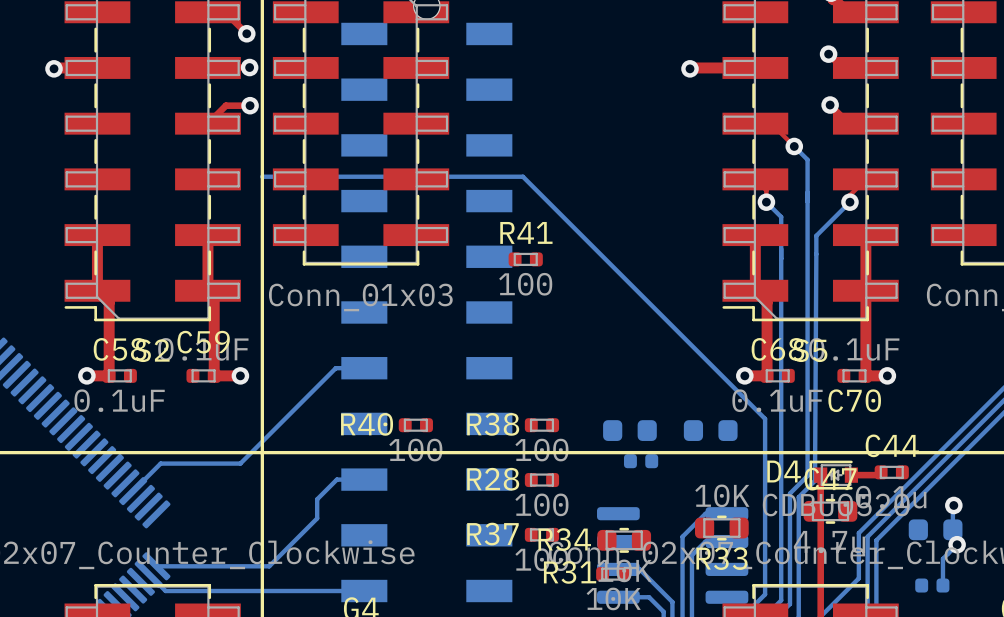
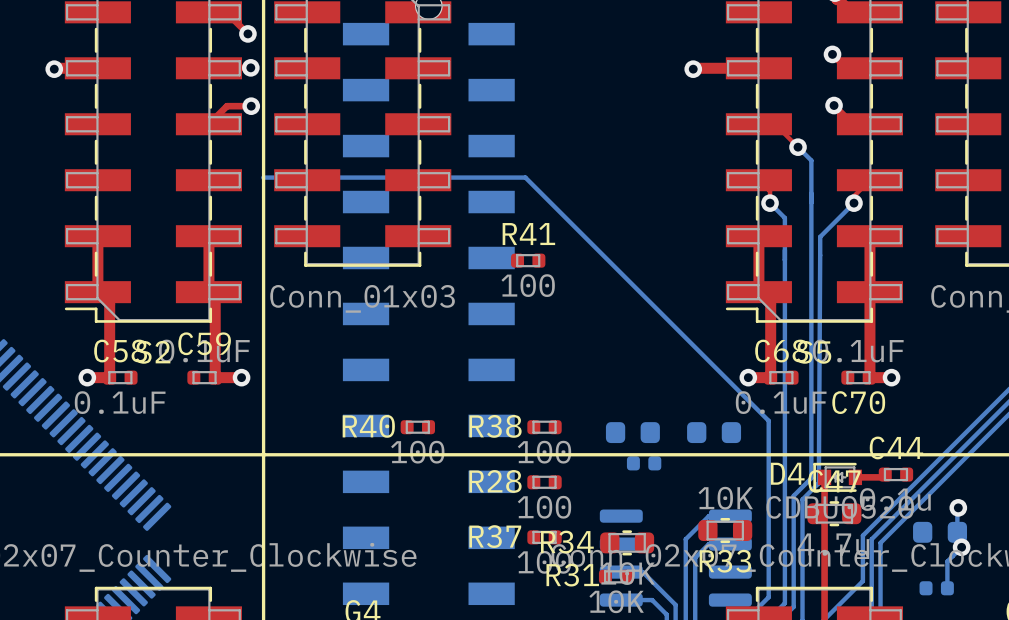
bottom track: (364, 368) (335, 368) (240, 463) (160, 463) (133, 491) -> none
bottom track: (364, 479) (336, 479) (317, 499) (317, 518) (269, 566) (159, 566) -> none
bottom track: (148, 574) (165, 591) (364, 591) -> none

